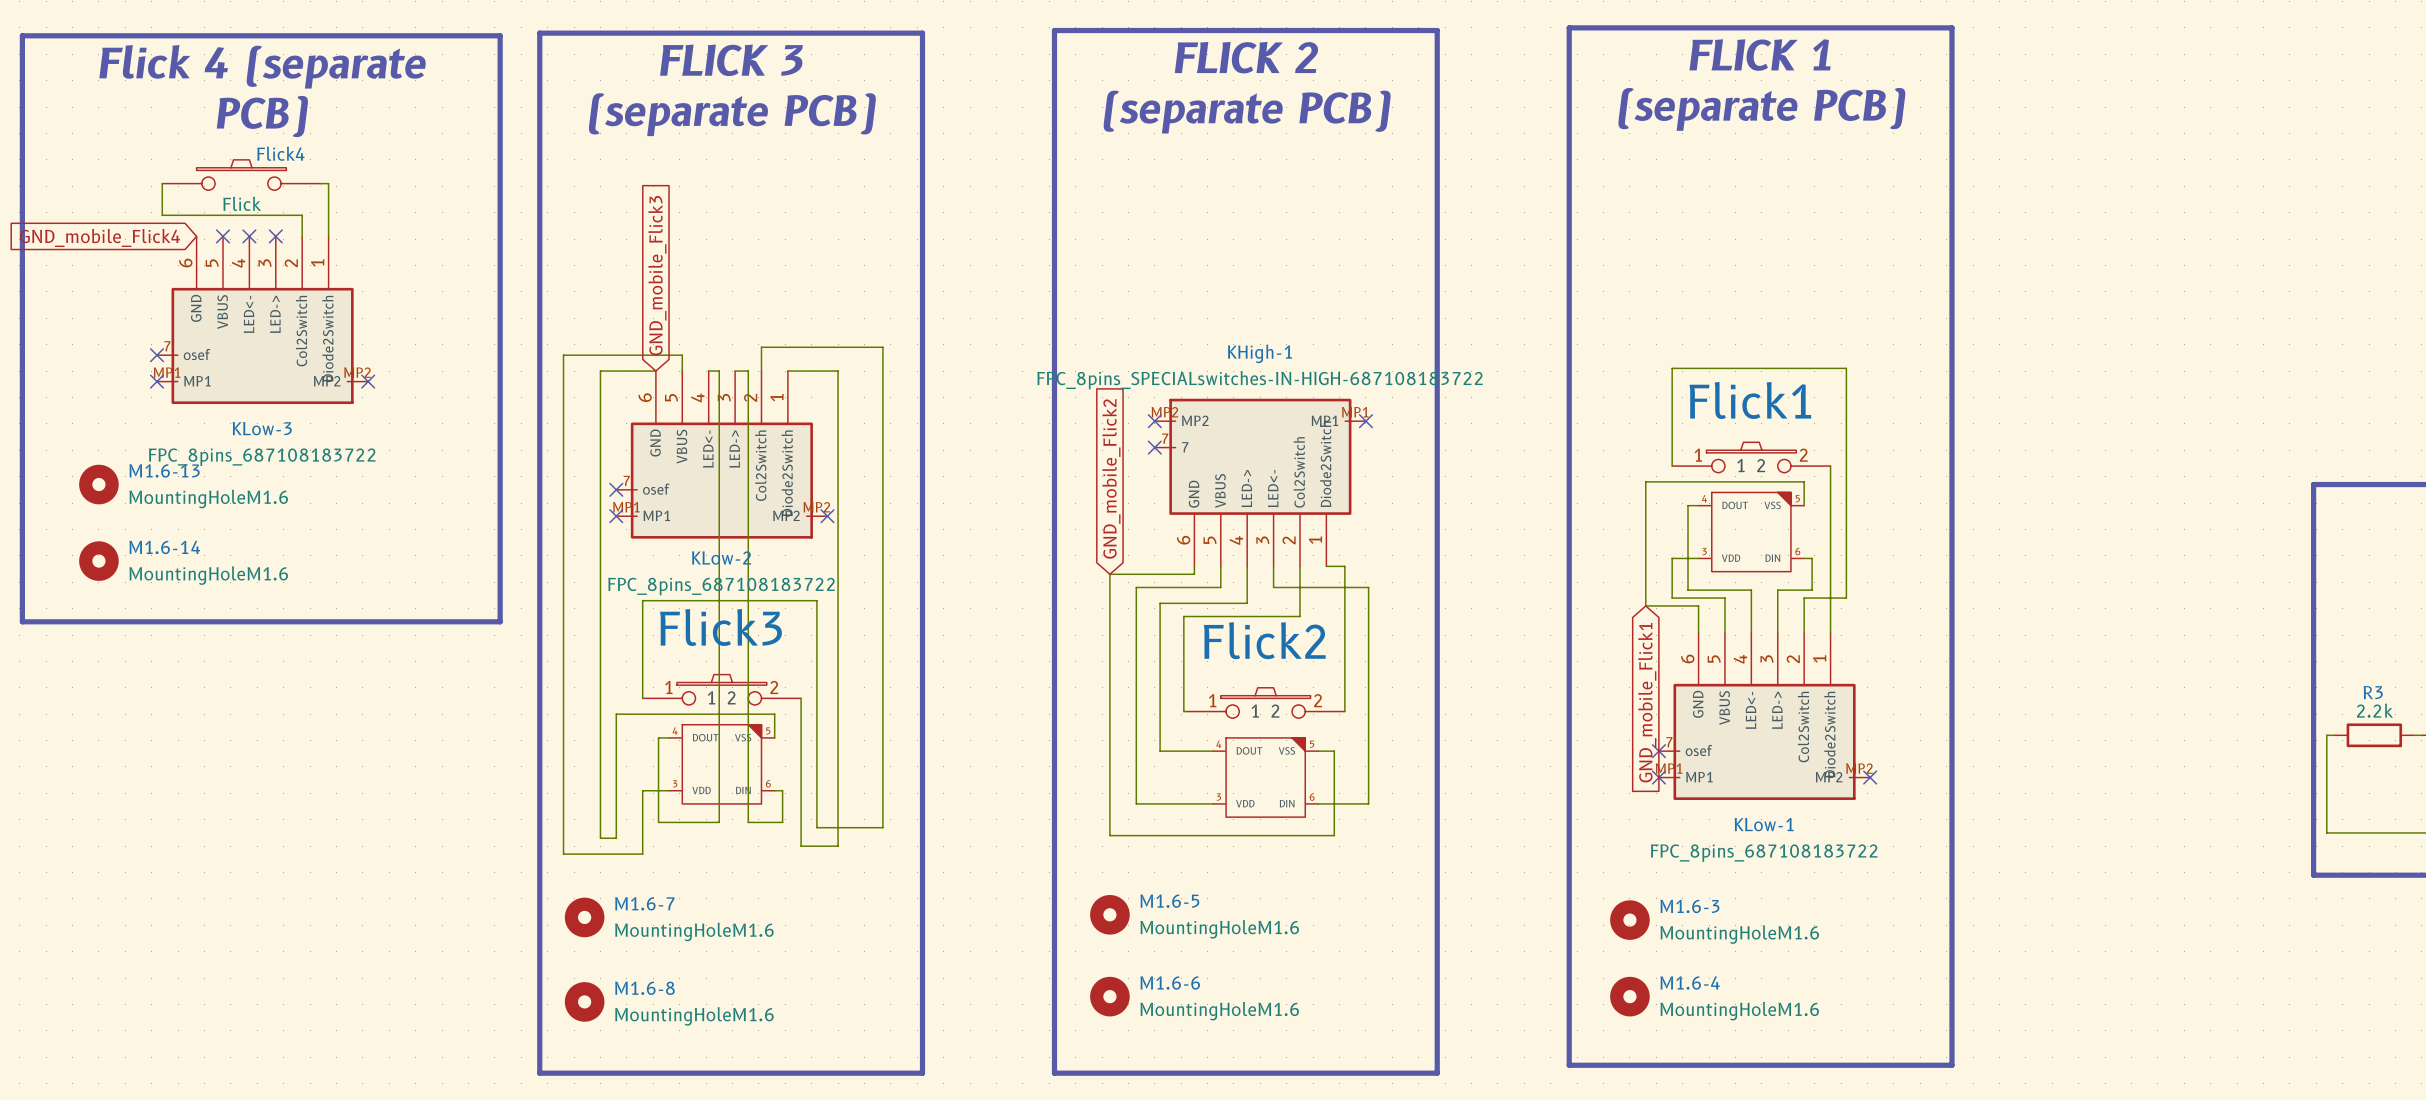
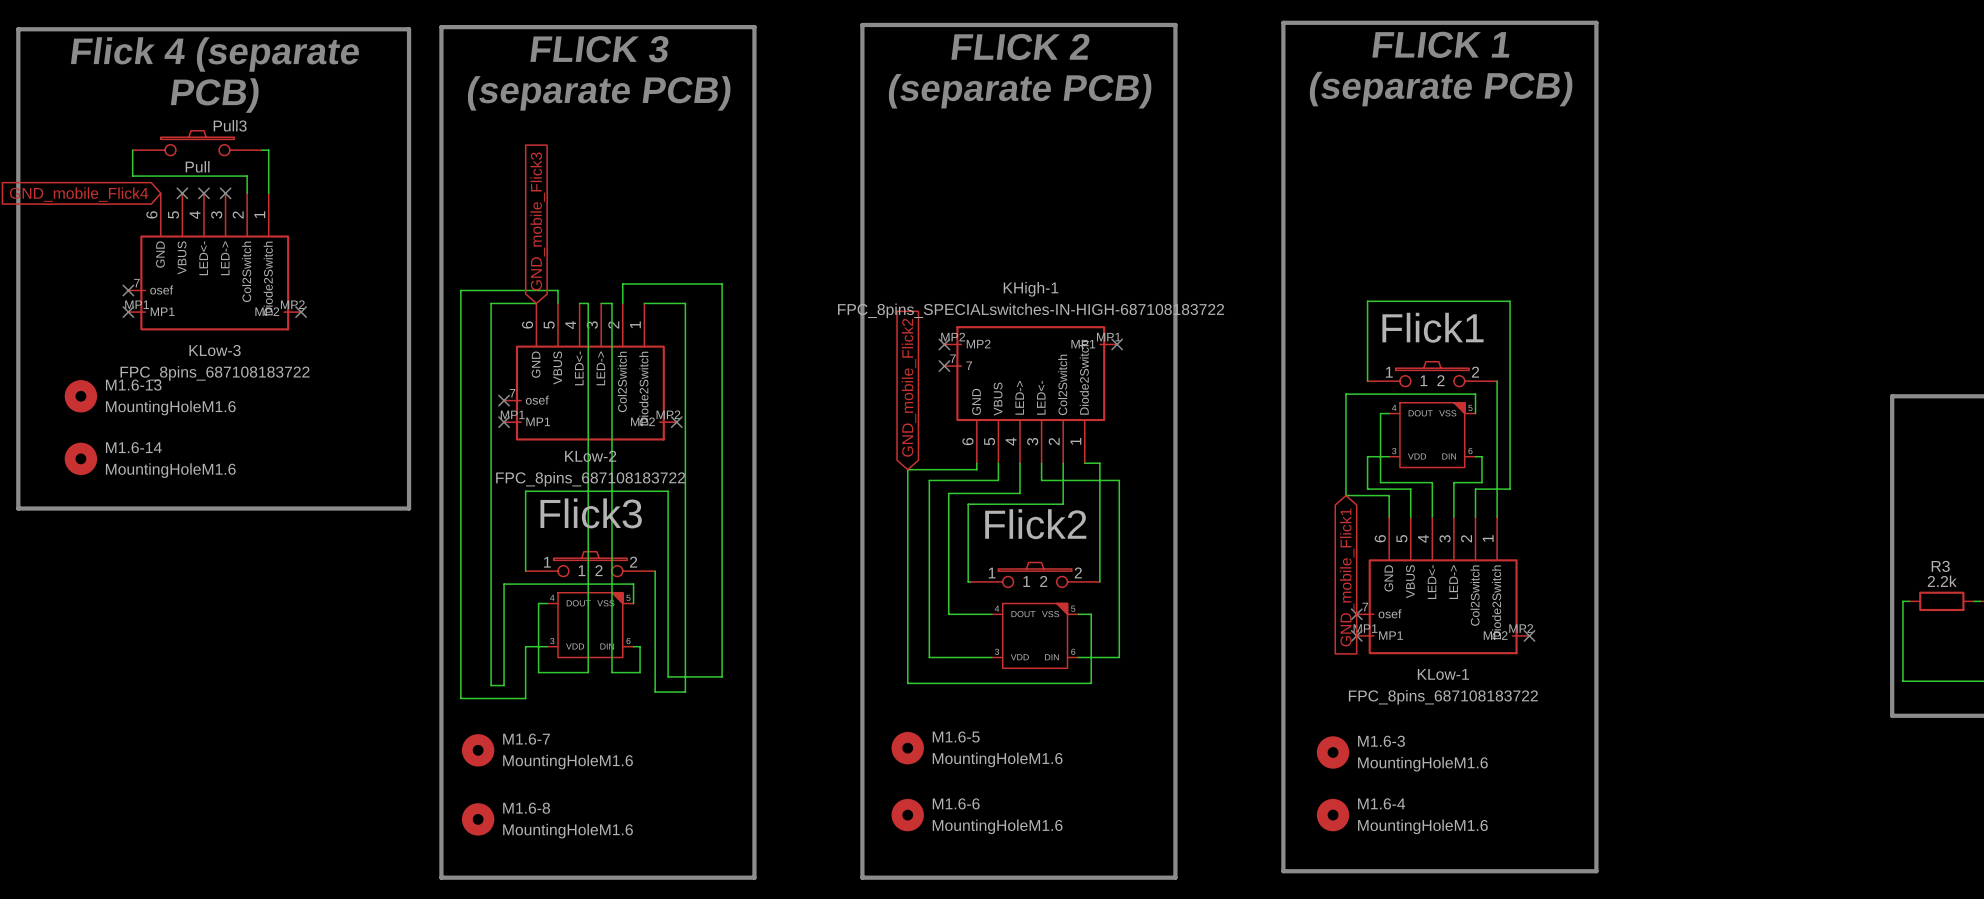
Flick4 name: Flick4 (280, 153) -> Pull3 (230, 125)
Flick4 value: Flick (242, 203) -> Pull (197, 166)

